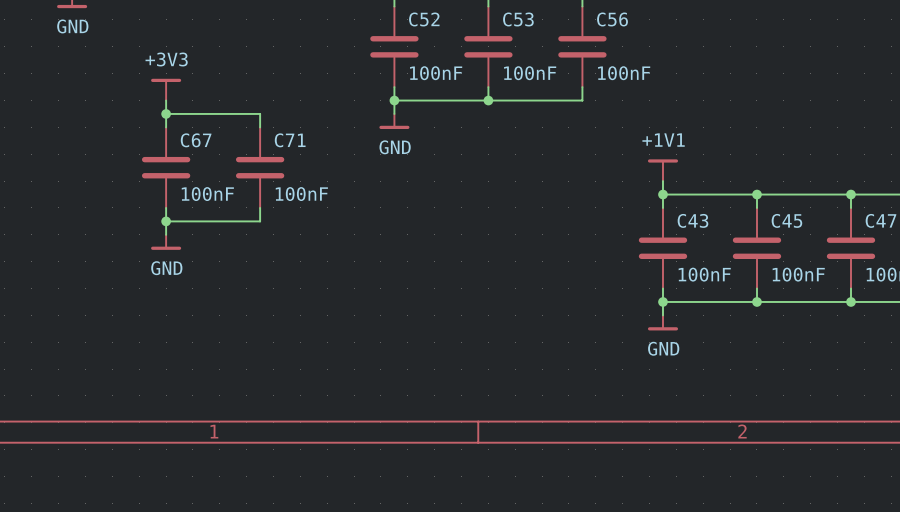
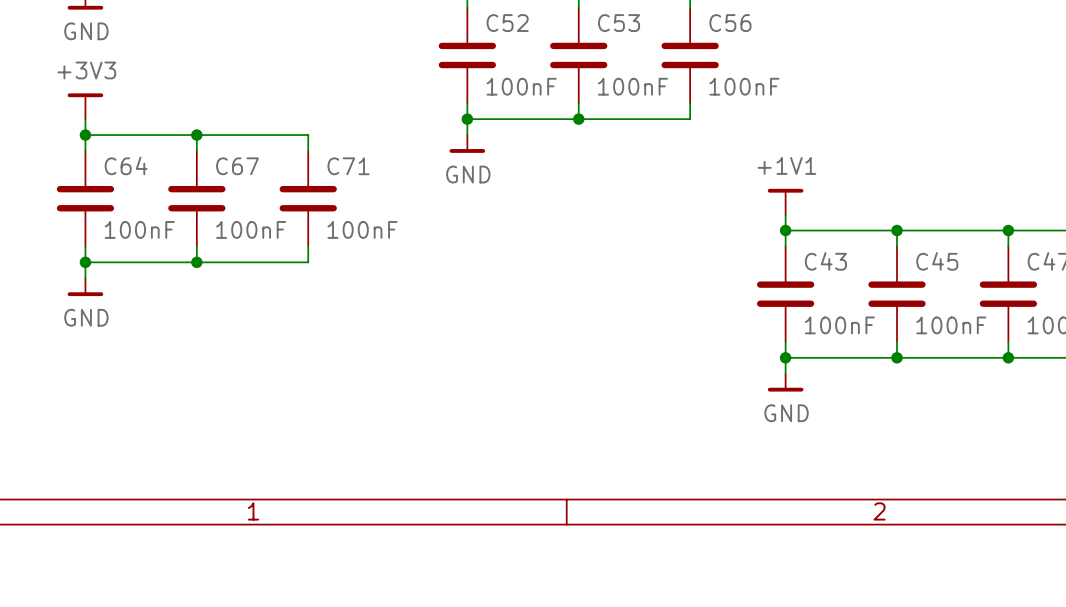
power symbol position: +3V3 (166, 89) -> +3V3 (85, 106)
wire: none -> (85, 119) (85, 150)
wire: (166, 100) (166, 113) -> (85, 135) (196, 135)
junction: none -> (85, 135)
C64: none -> 100nF (85, 198)
wire: none -> (85, 246) (85, 278)
junction: none -> (85, 262)
wire: (166, 221) (166, 234) -> (196, 262) (85, 262)
power symbol position: GND (166, 242) -> GND (85, 287)

